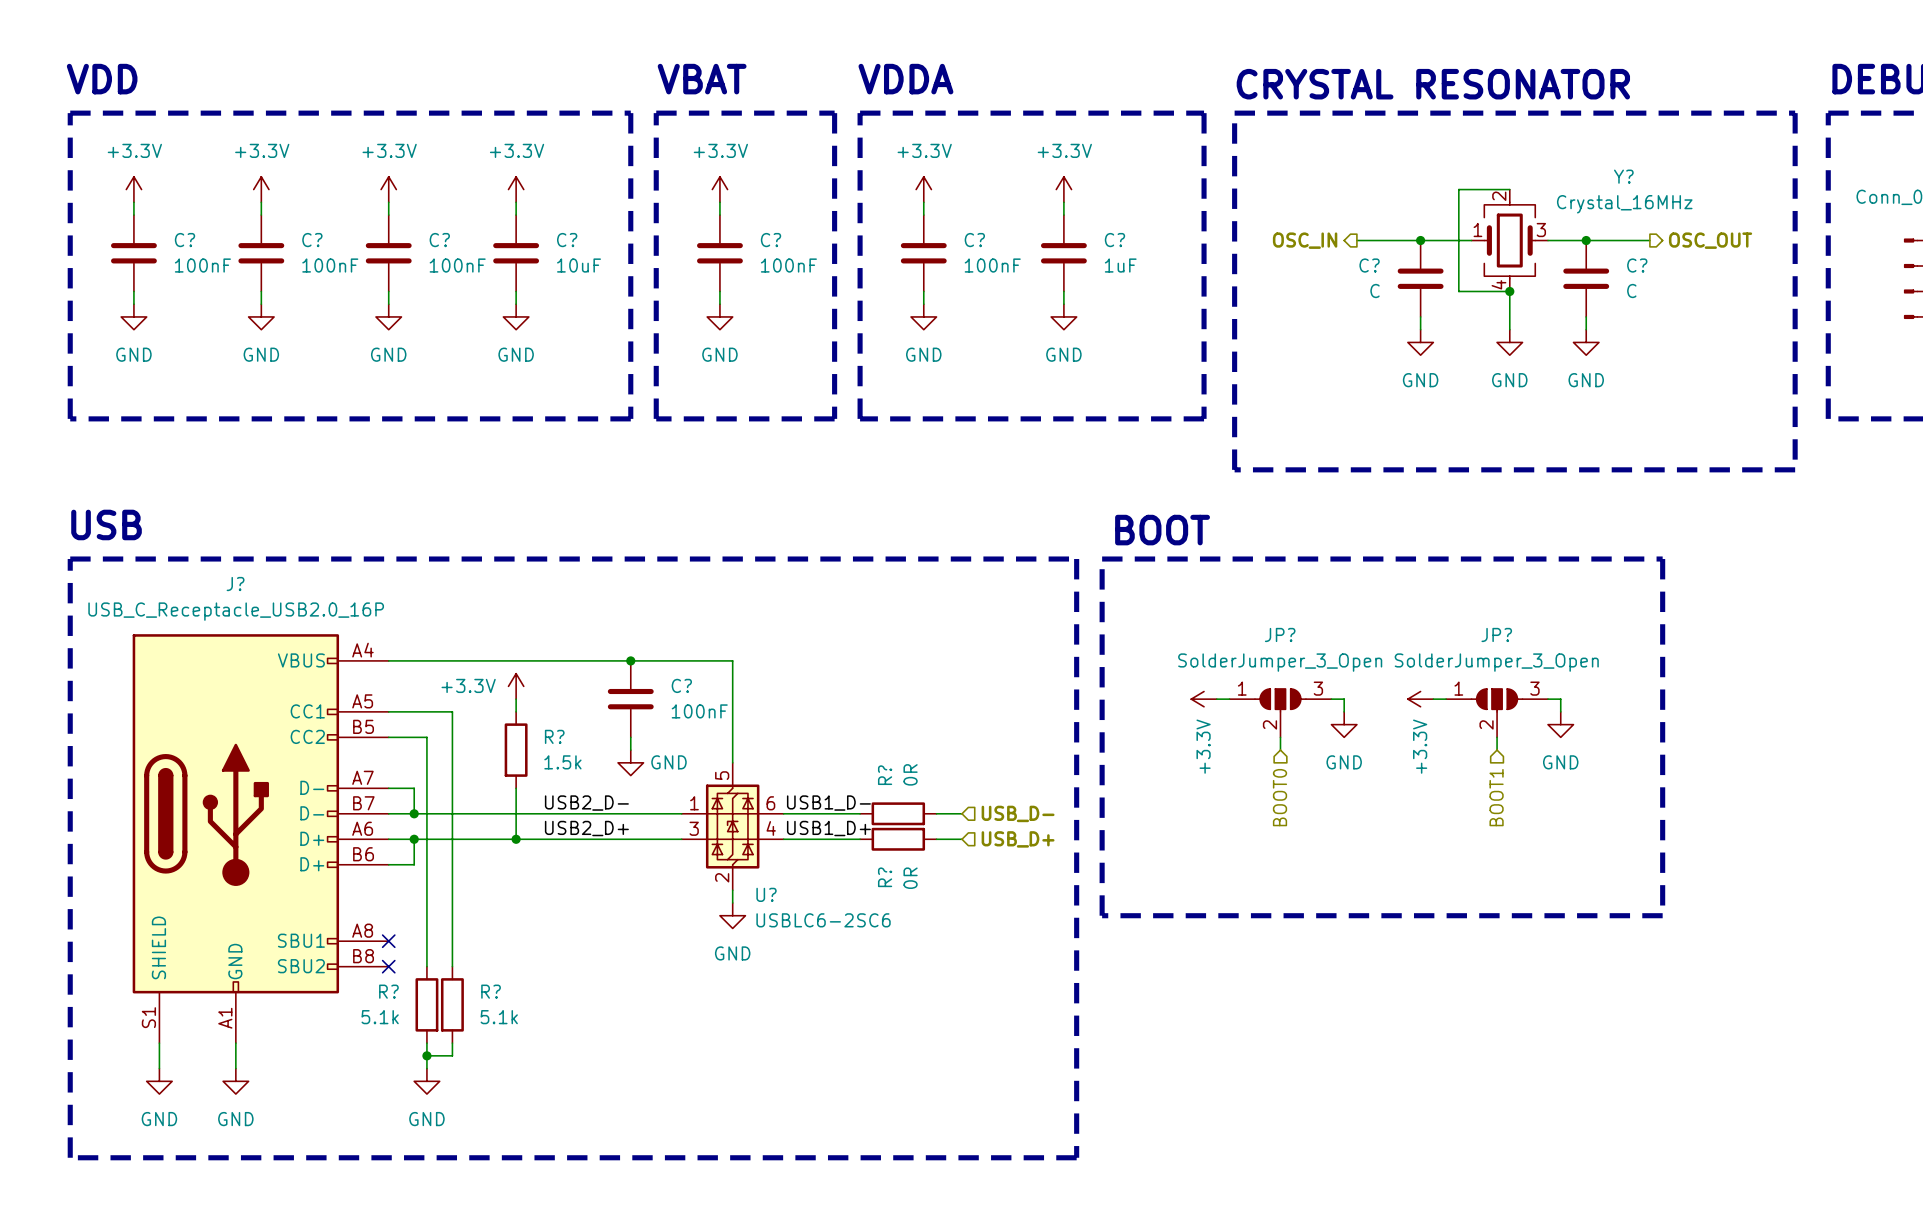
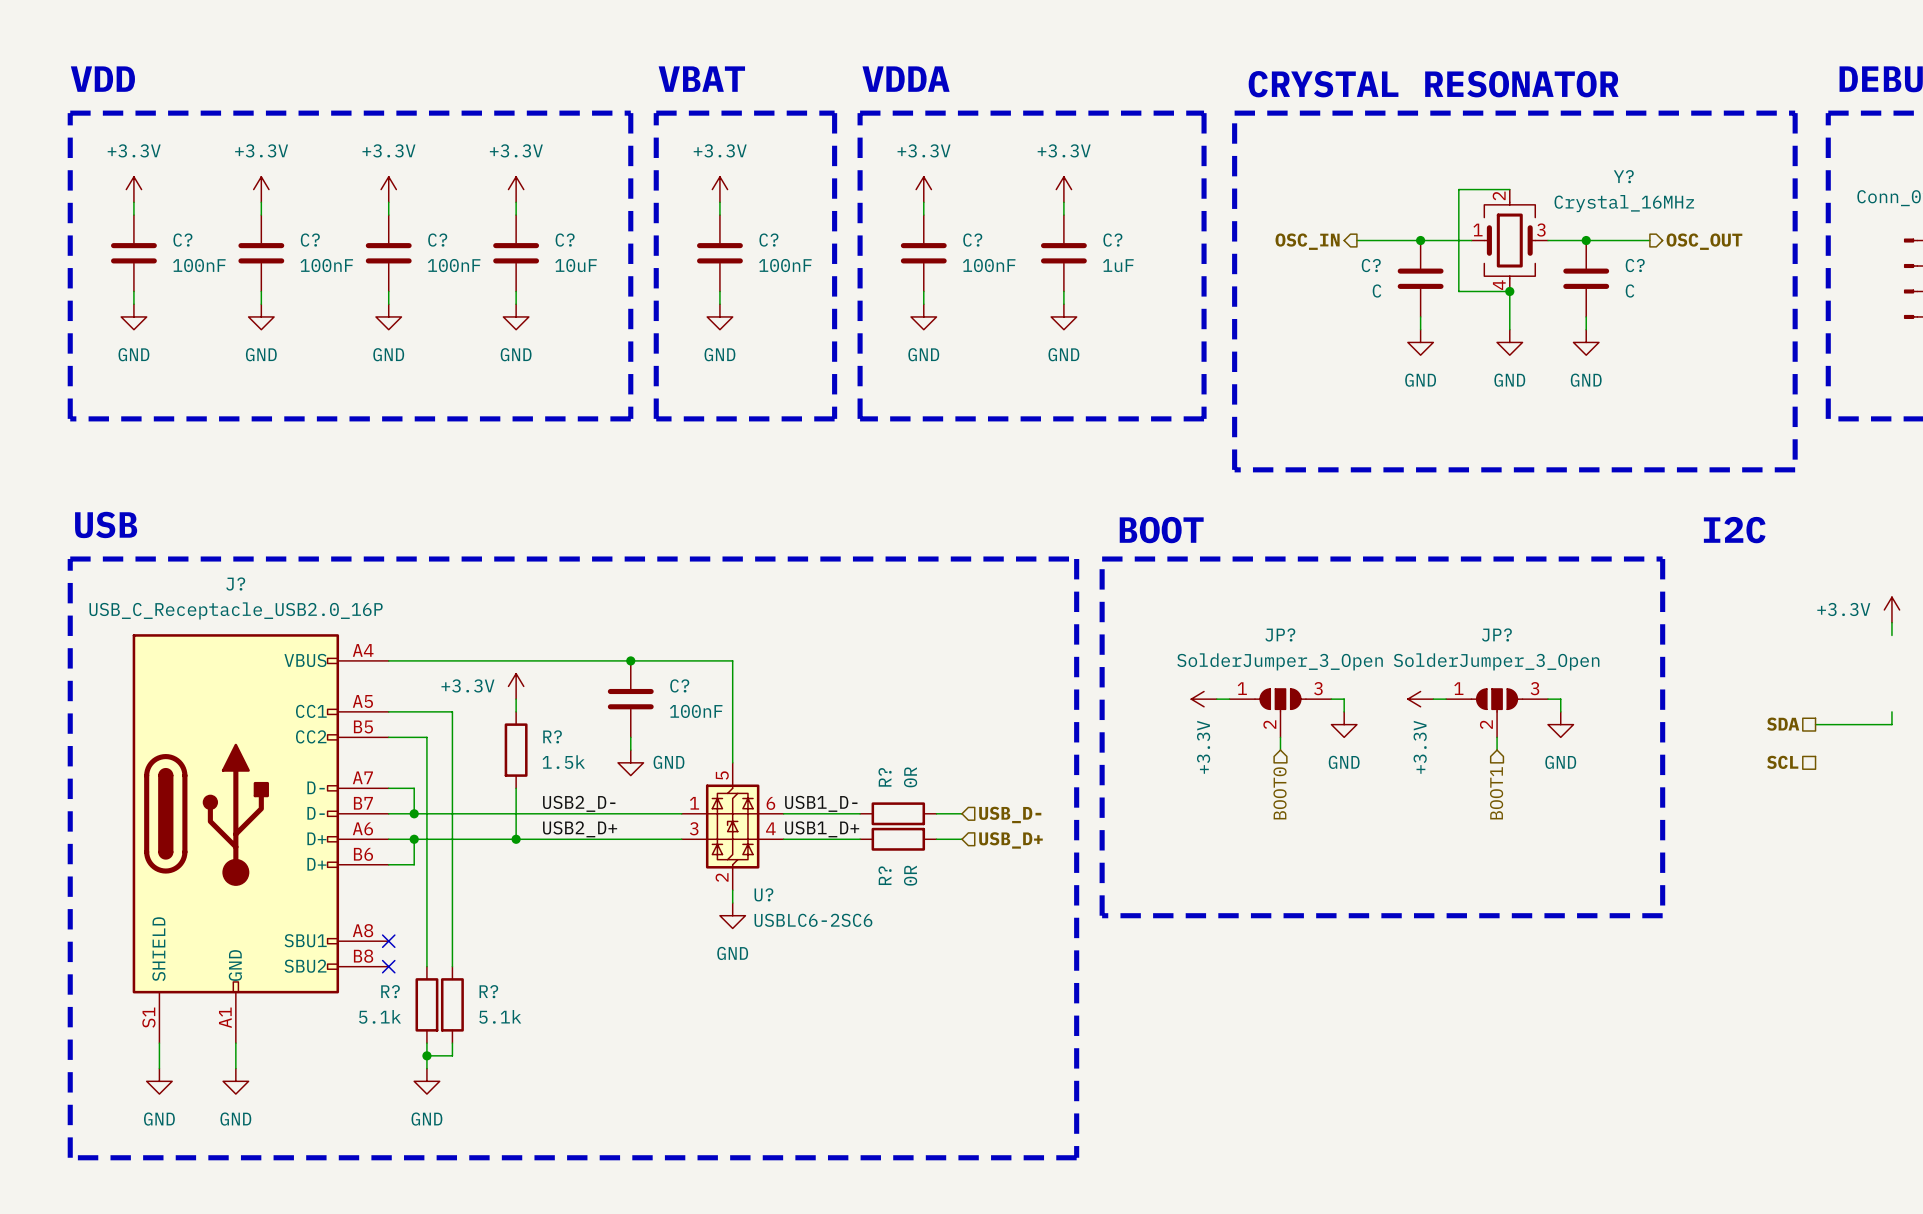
text: none -> I2C (1734, 530)
power symbol: none -> +3.3V (1891, 609)
wire: none -> (1891, 622) (1891, 635)
wire: none -> (1891, 711) (1891, 724) (1815, 724)
hierarchical label: none -> SDA (1783, 724)
hierarchical label: none -> SCL (1782, 762)

